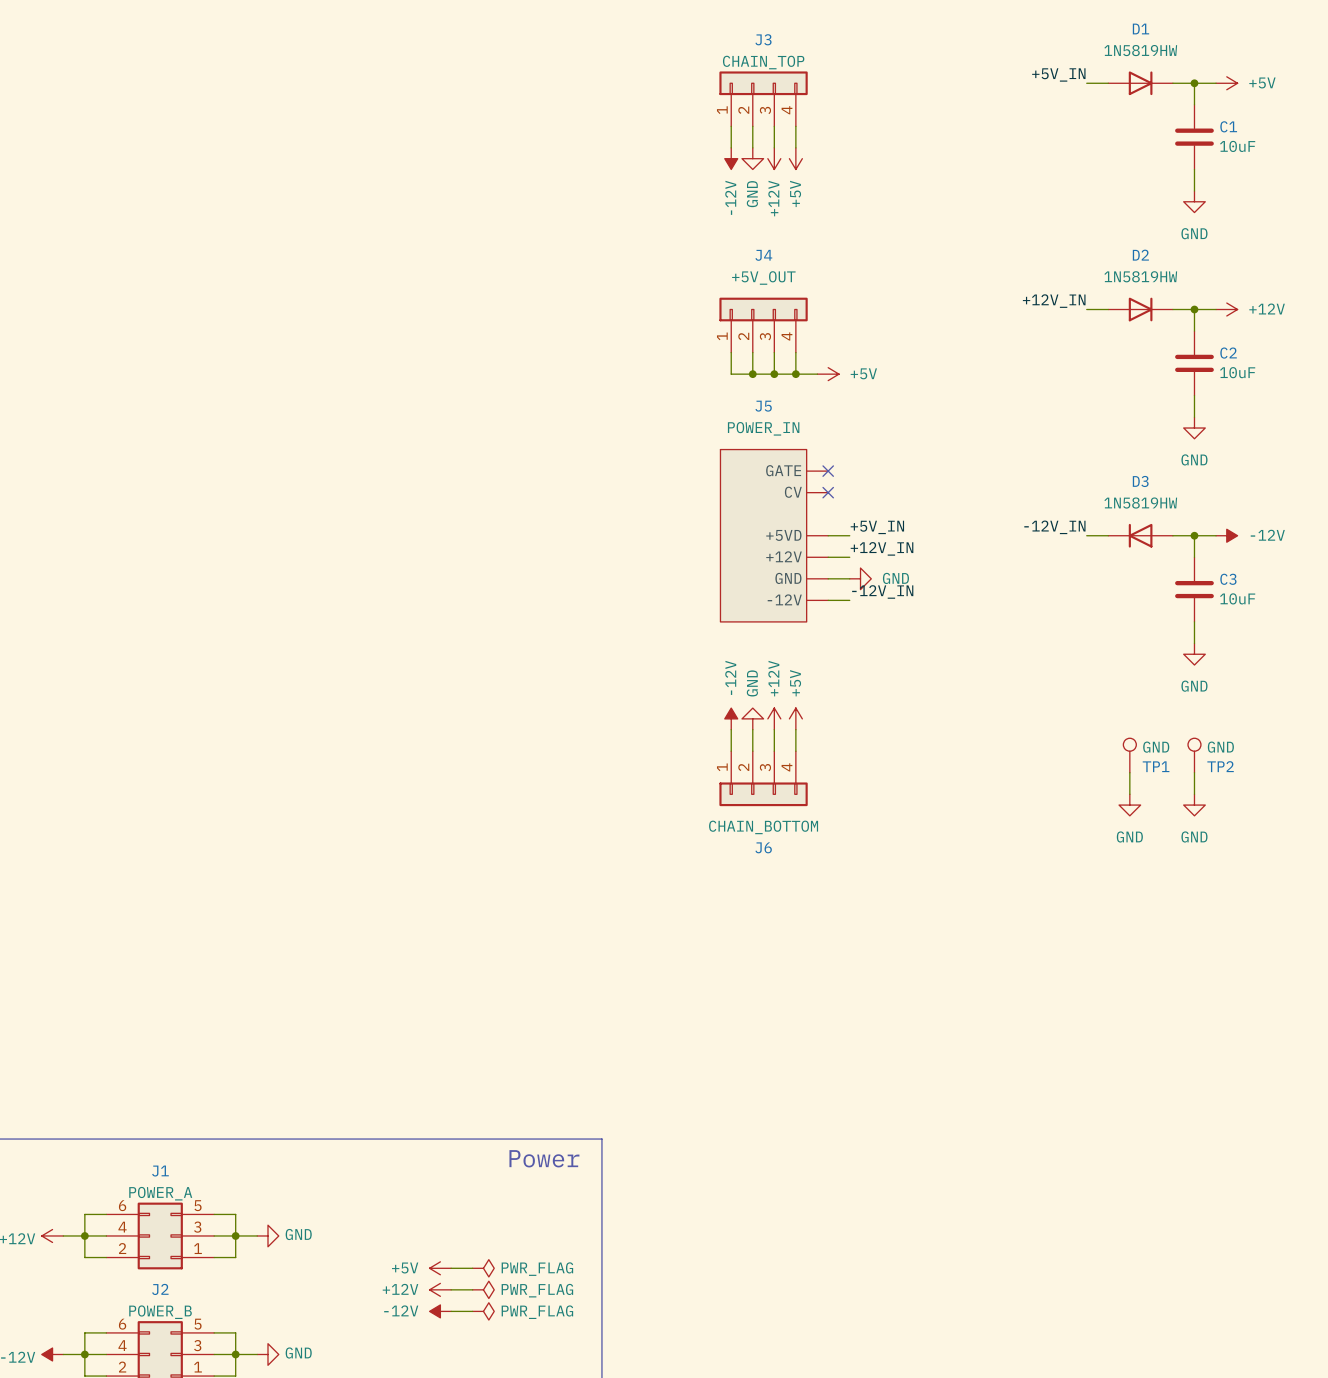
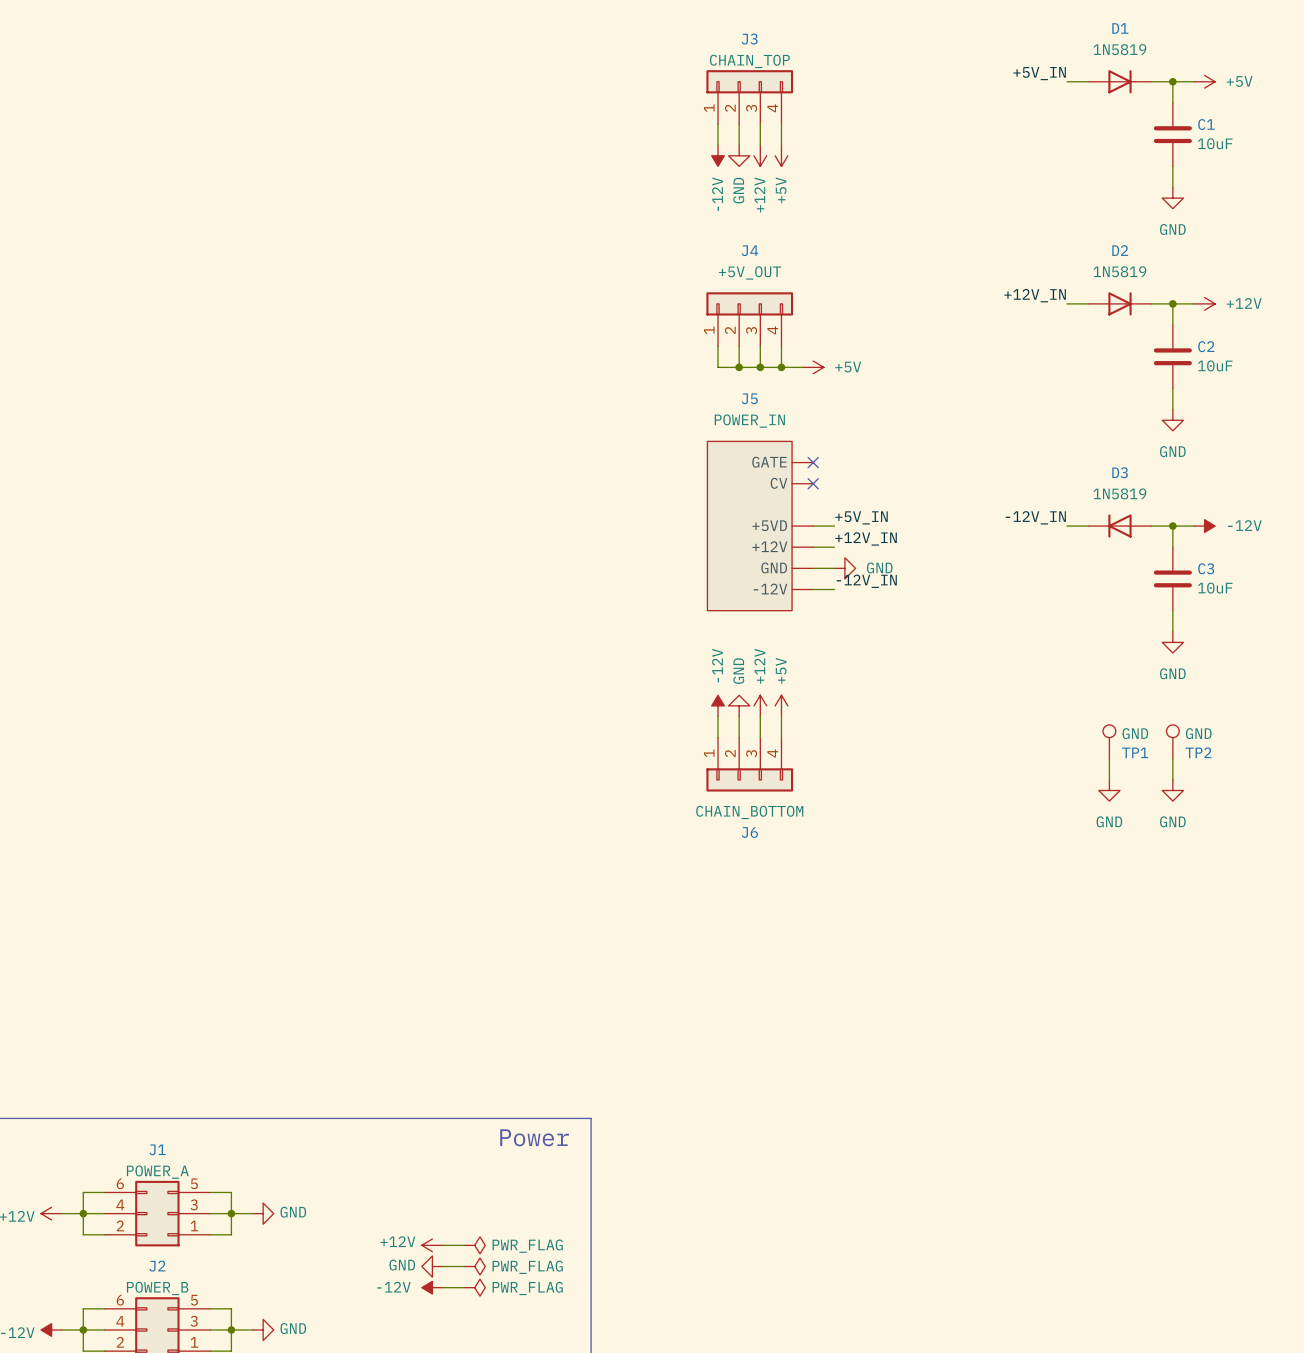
D1 value: 1N5819HW (1140, 50) -> 1N5819 (1119, 49)
D2 value: 1N5819HW (1140, 276) -> 1N5819 (1119, 271)
D3 value: 1N5819HW (1140, 503) -> 1N5819 (1119, 493)
power symbol: +5V (440, 1268) -> +12V (432, 1245)
power symbol: +12V (440, 1289) -> GND (432, 1266)

